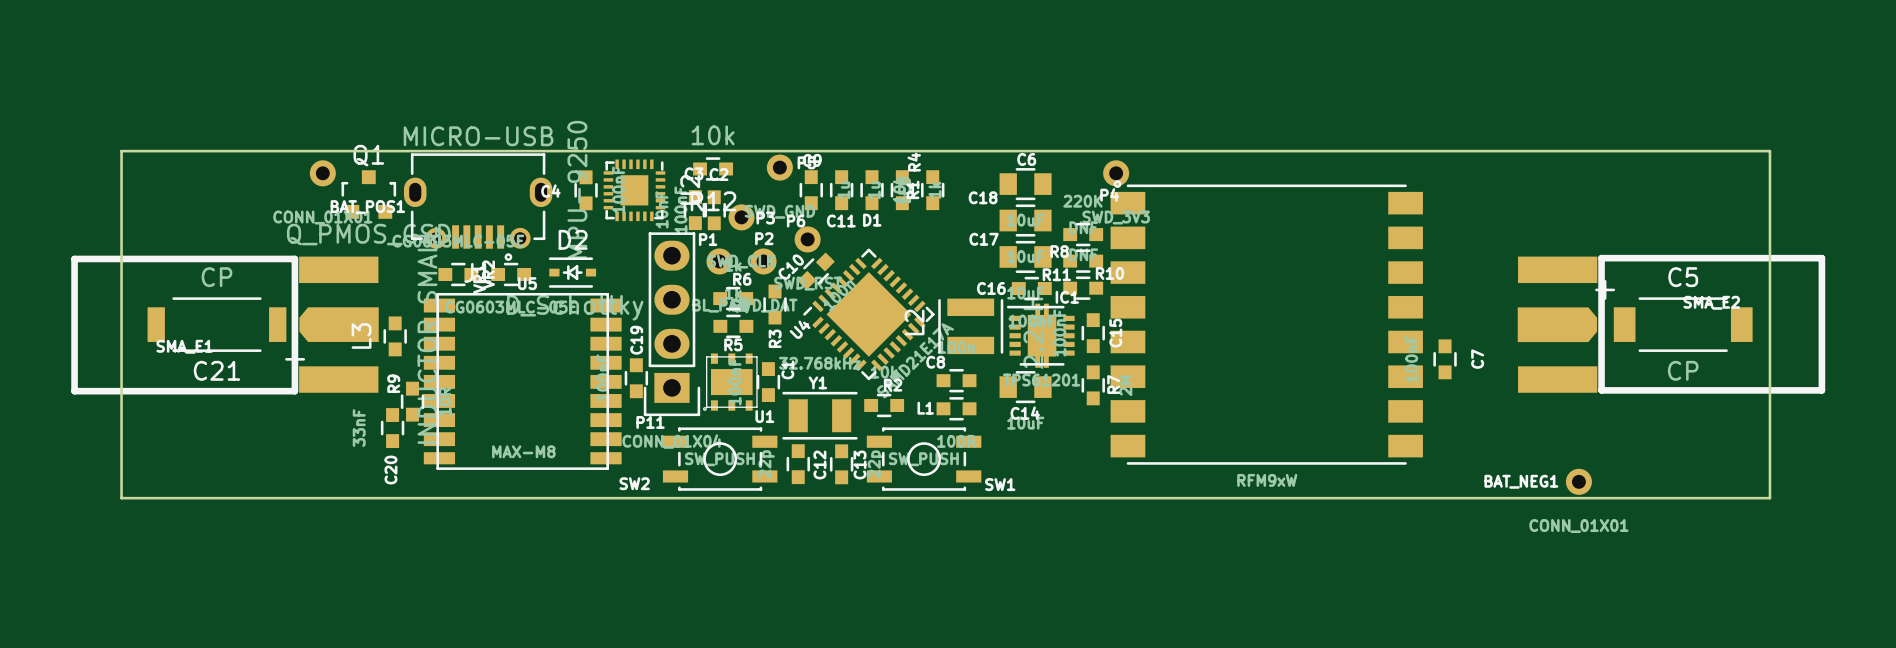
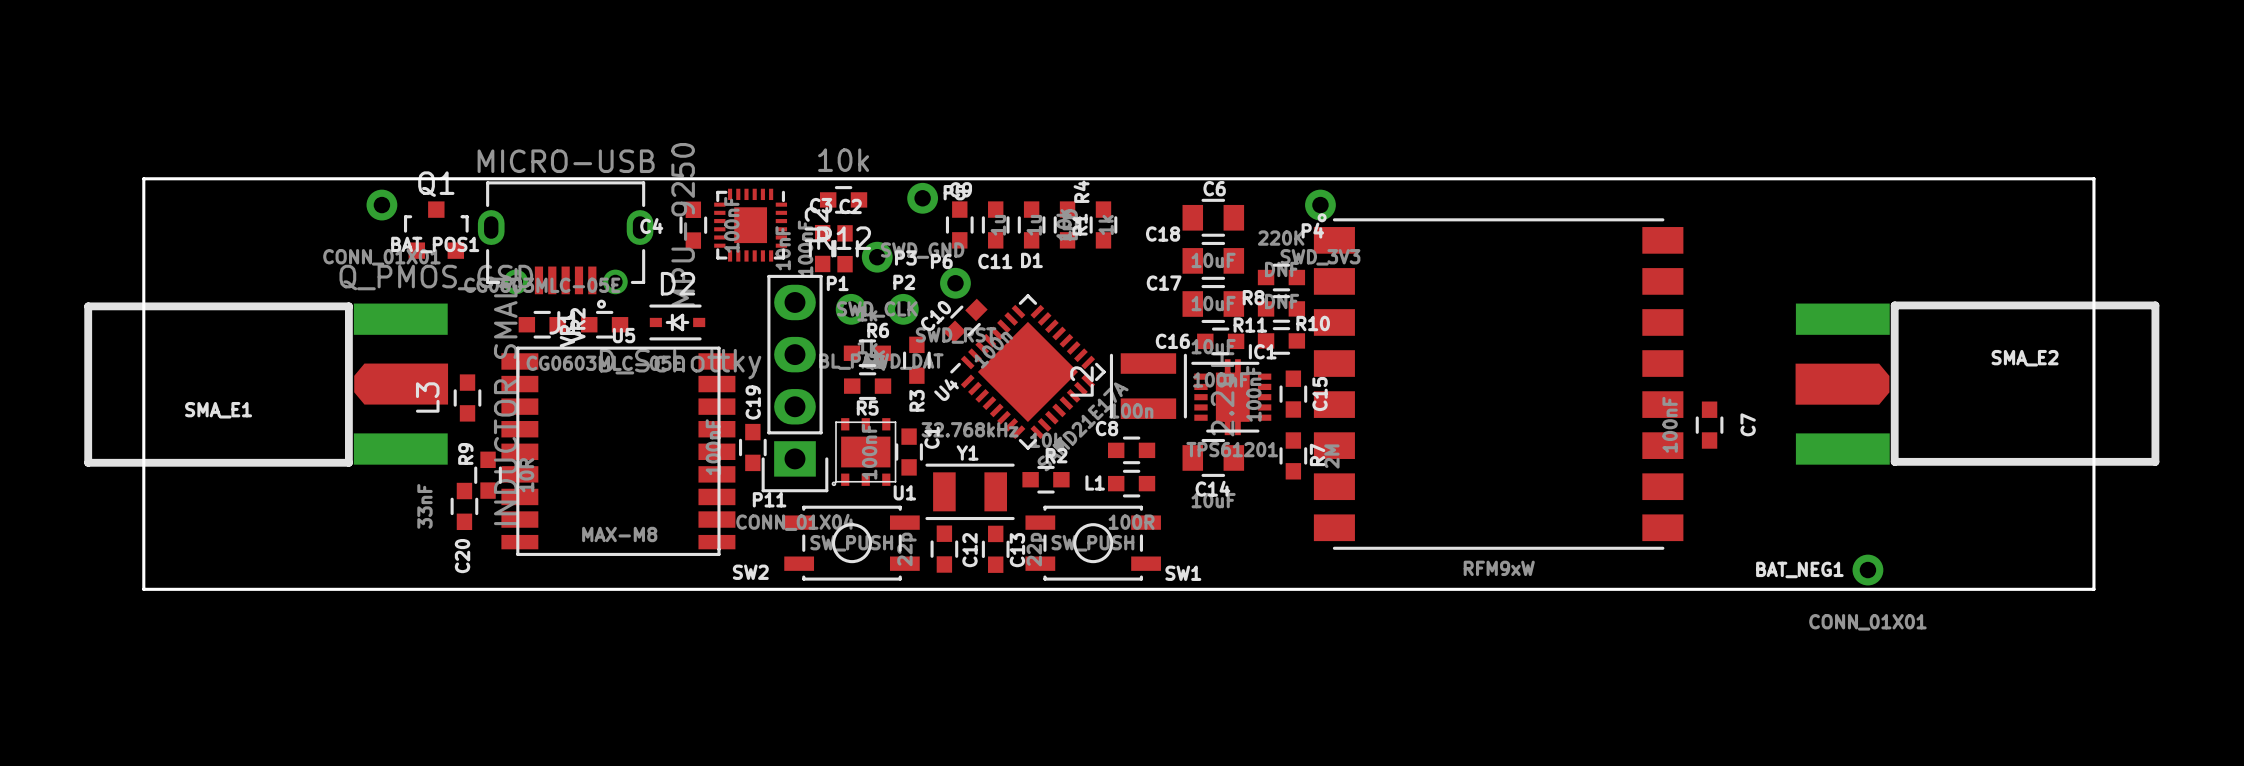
C5: CP (1673, 315) -> none
C21: CP (226, 333) -> none

